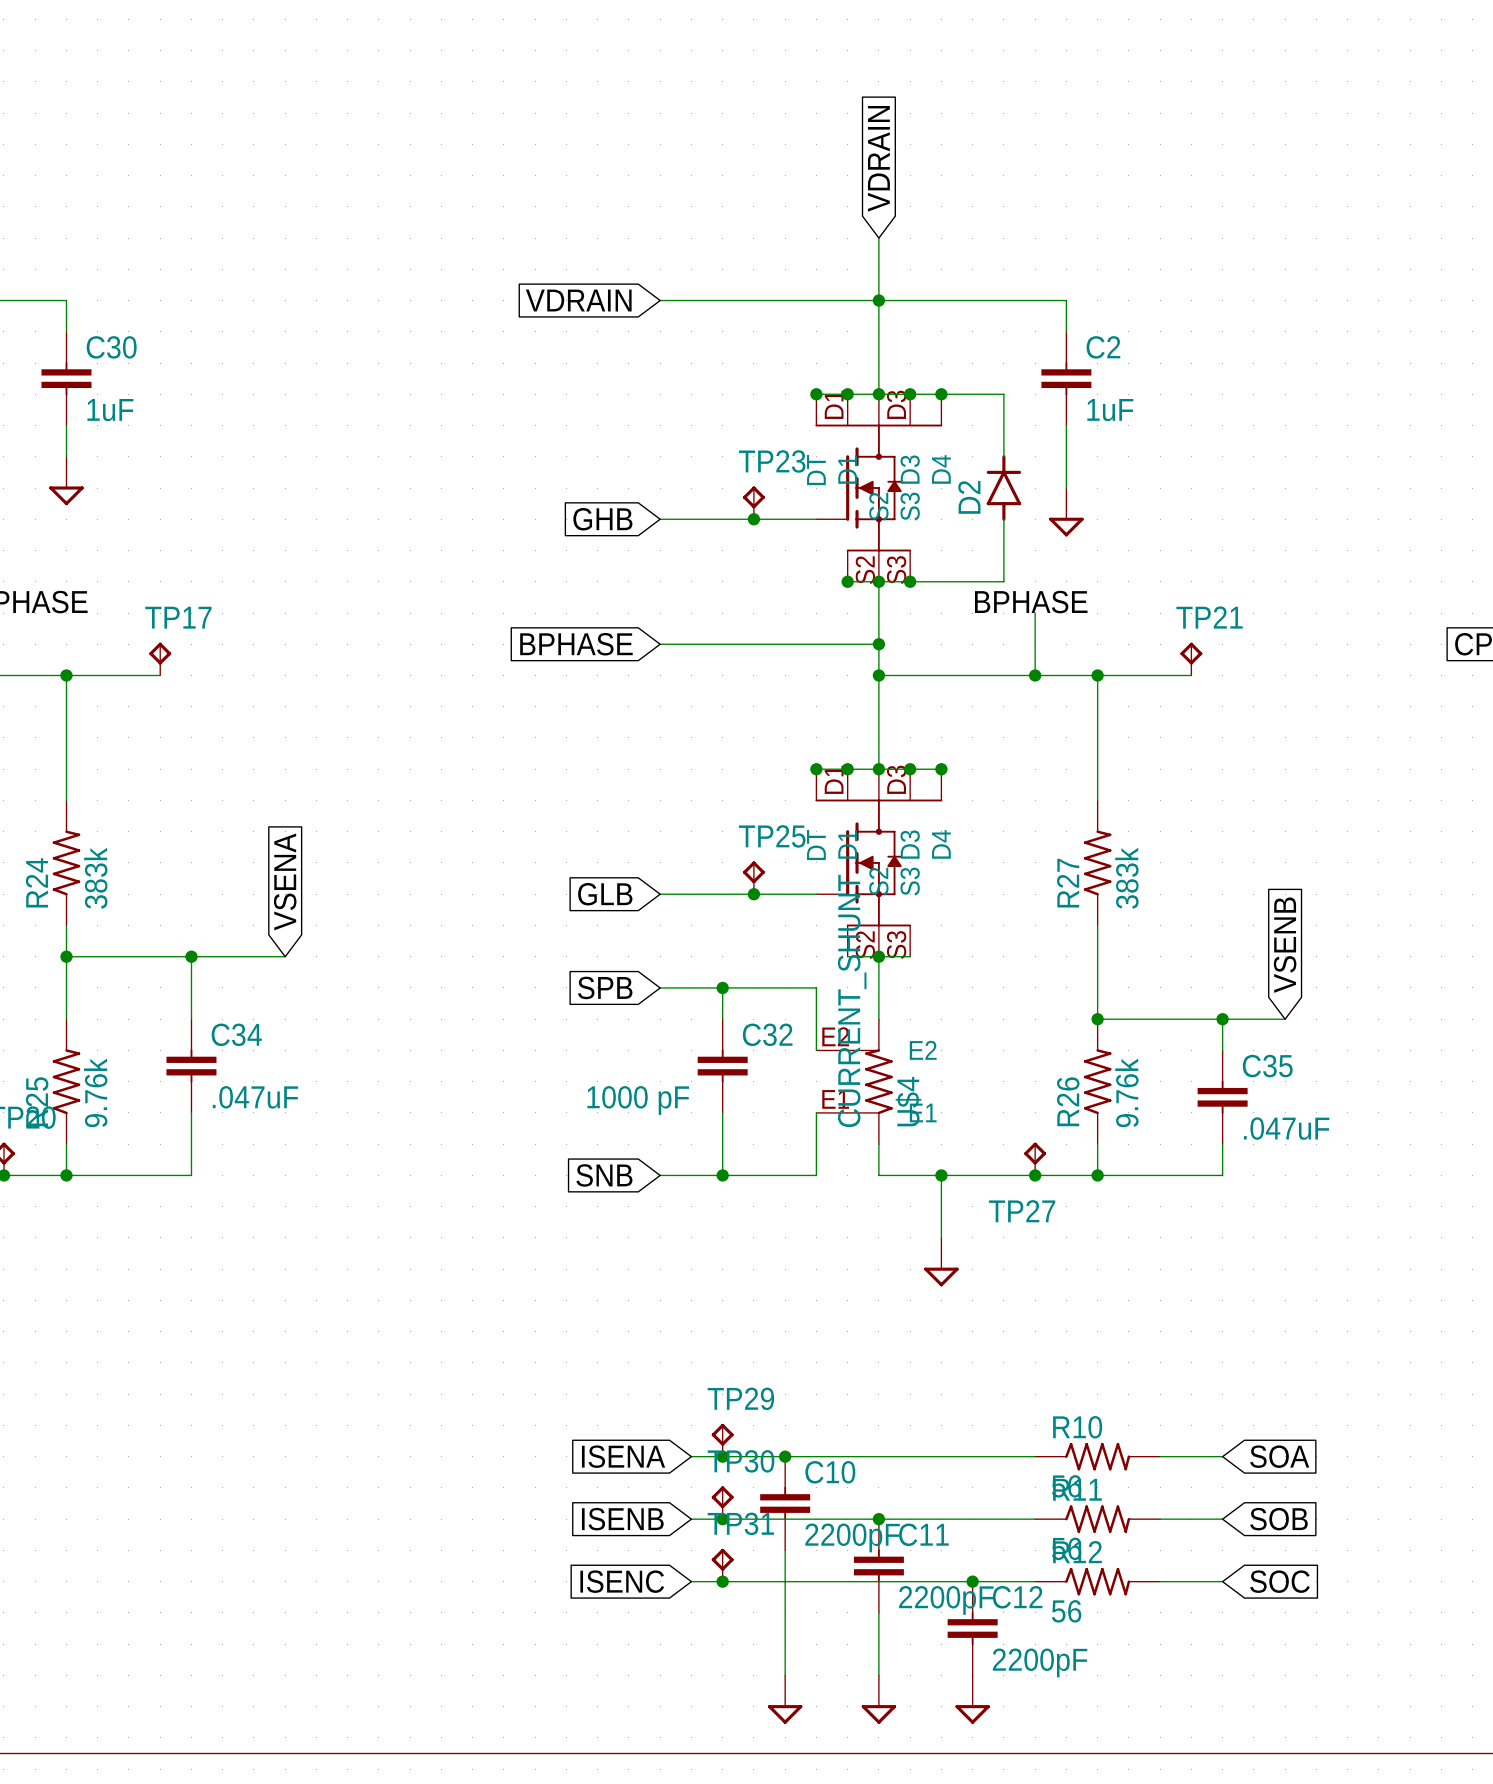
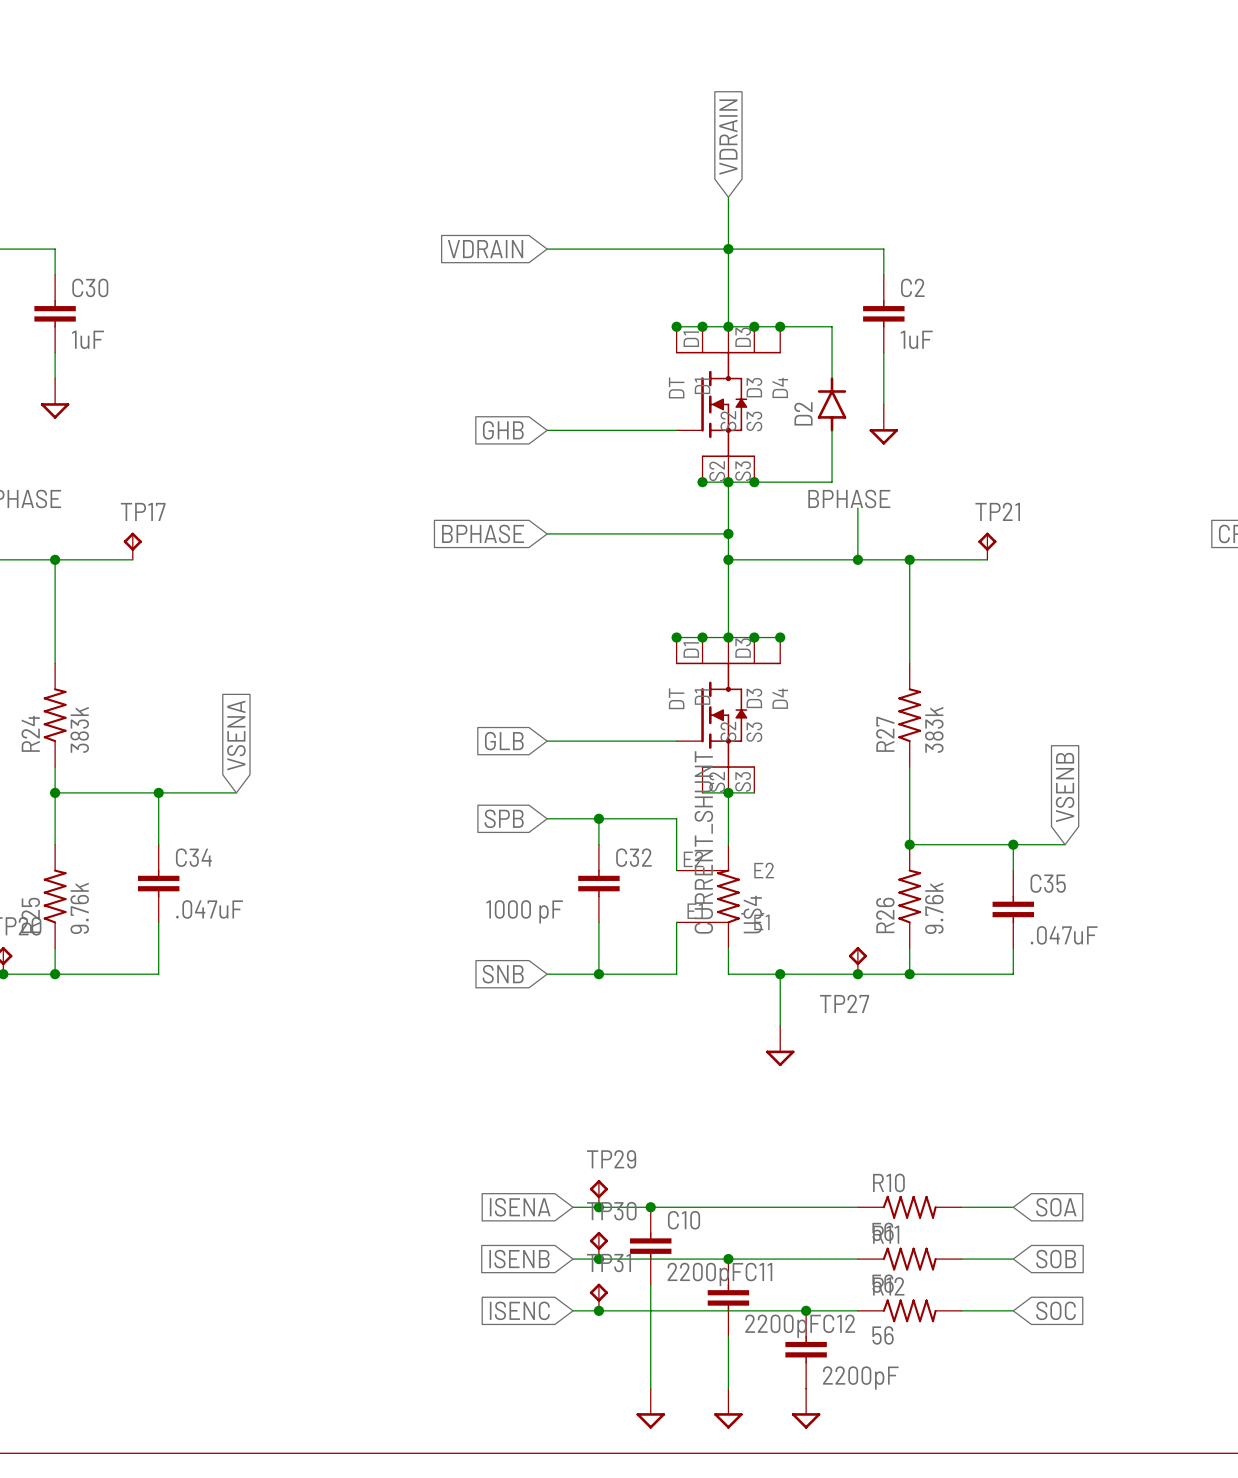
TP23: (753, 502) -> none
junction: (753, 519) -> none
TP25: (753, 877) -> none
junction: (753, 894) -> none

